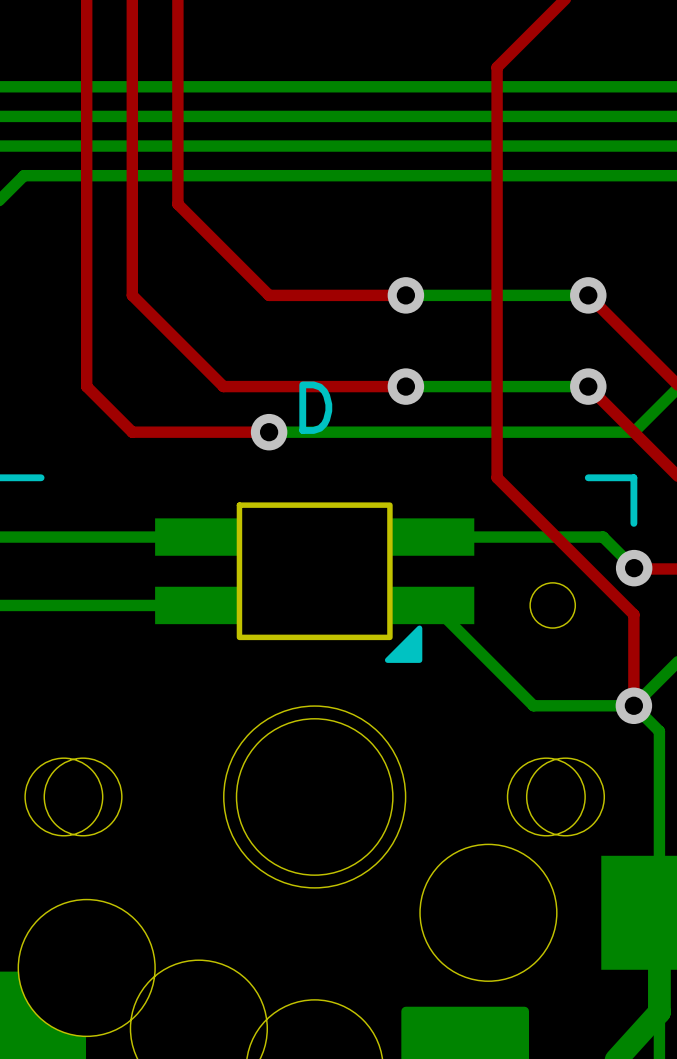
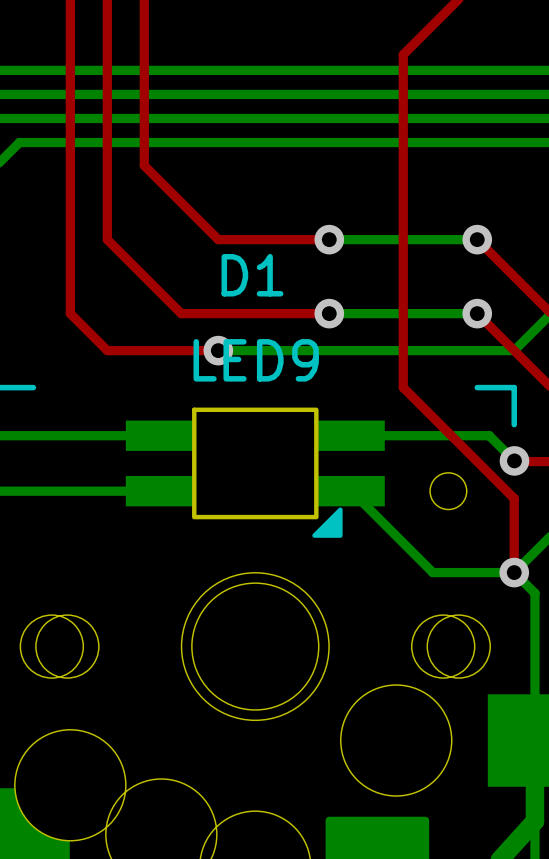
D name: D (315, 407) -> D1 (252, 275)
LED9 name: none -> LED9 (256, 360)

